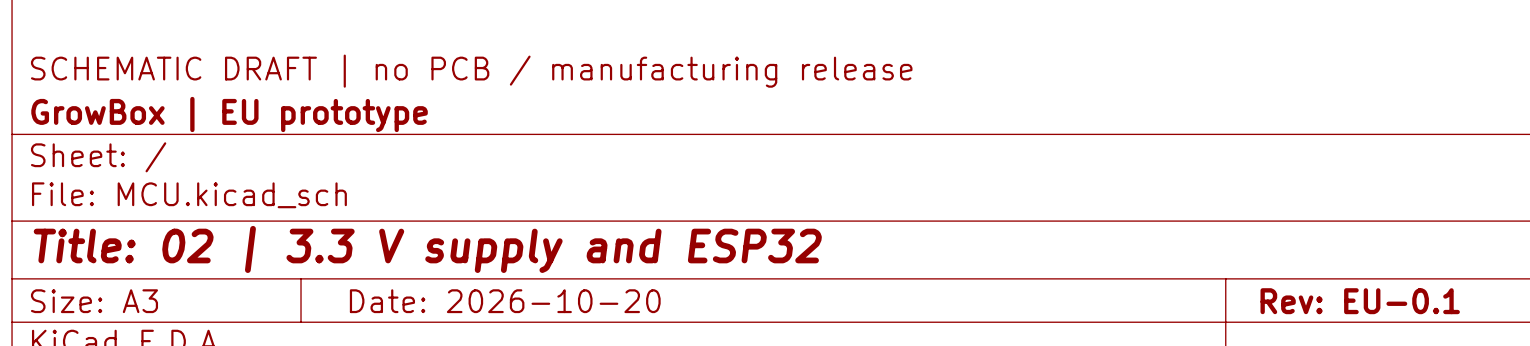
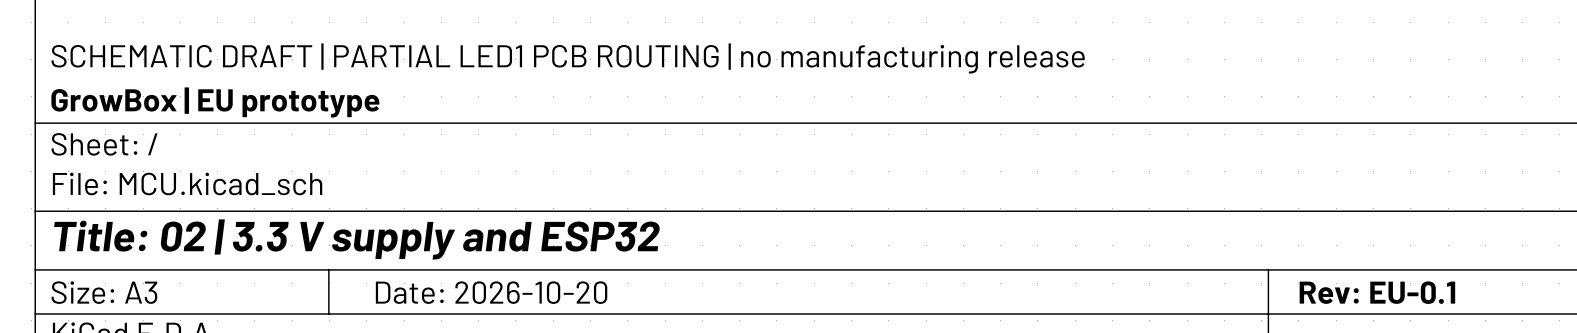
title block: SCHEMATIC DRAFT | no PCB / manufacturing release (471, 71) -> SCHEMATIC DRAFT | PARTIAL LED1 PCB ROUTING | no manufacturing release (568, 58)

